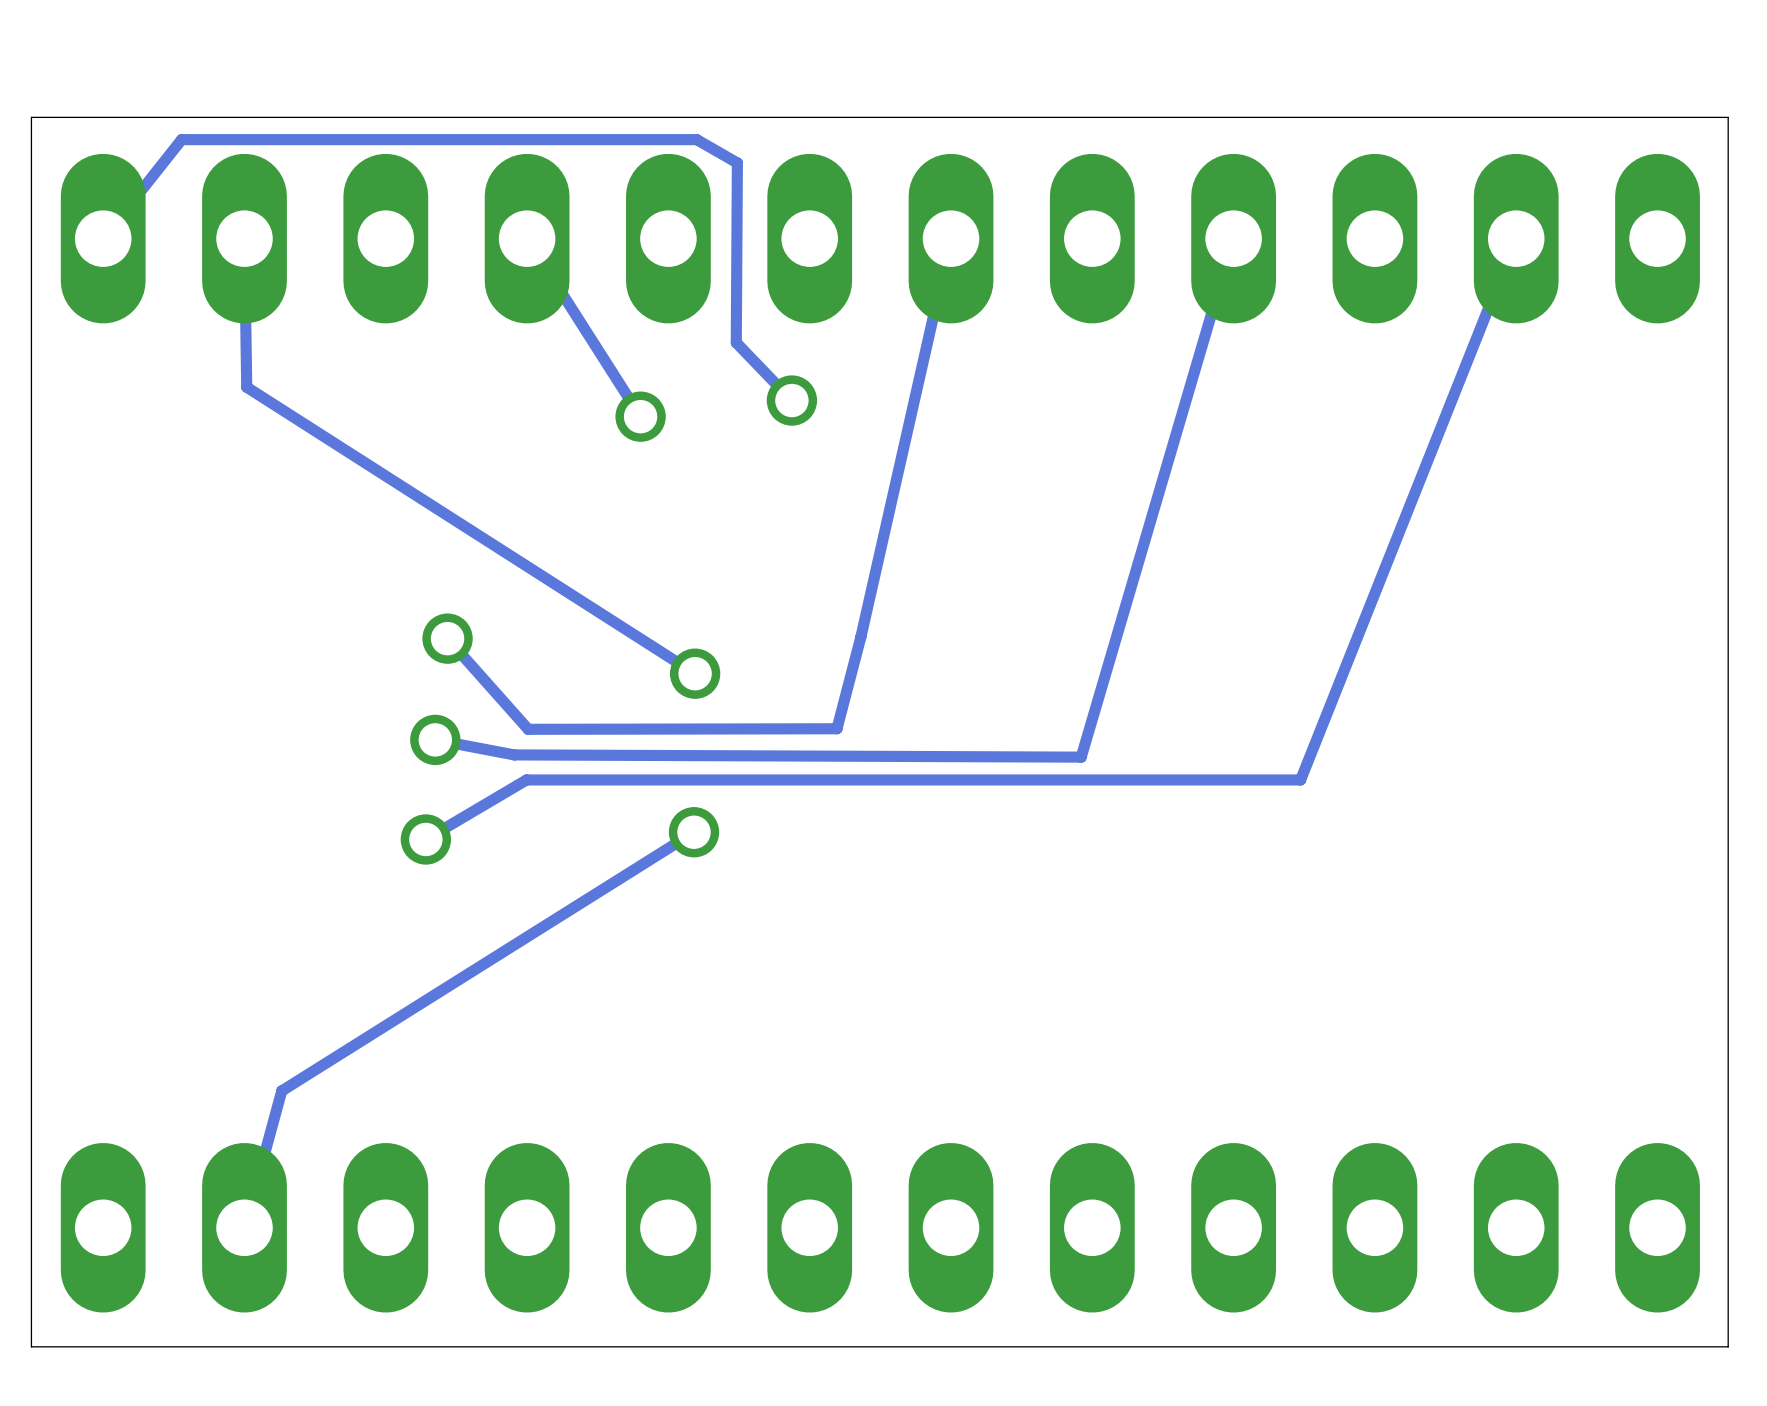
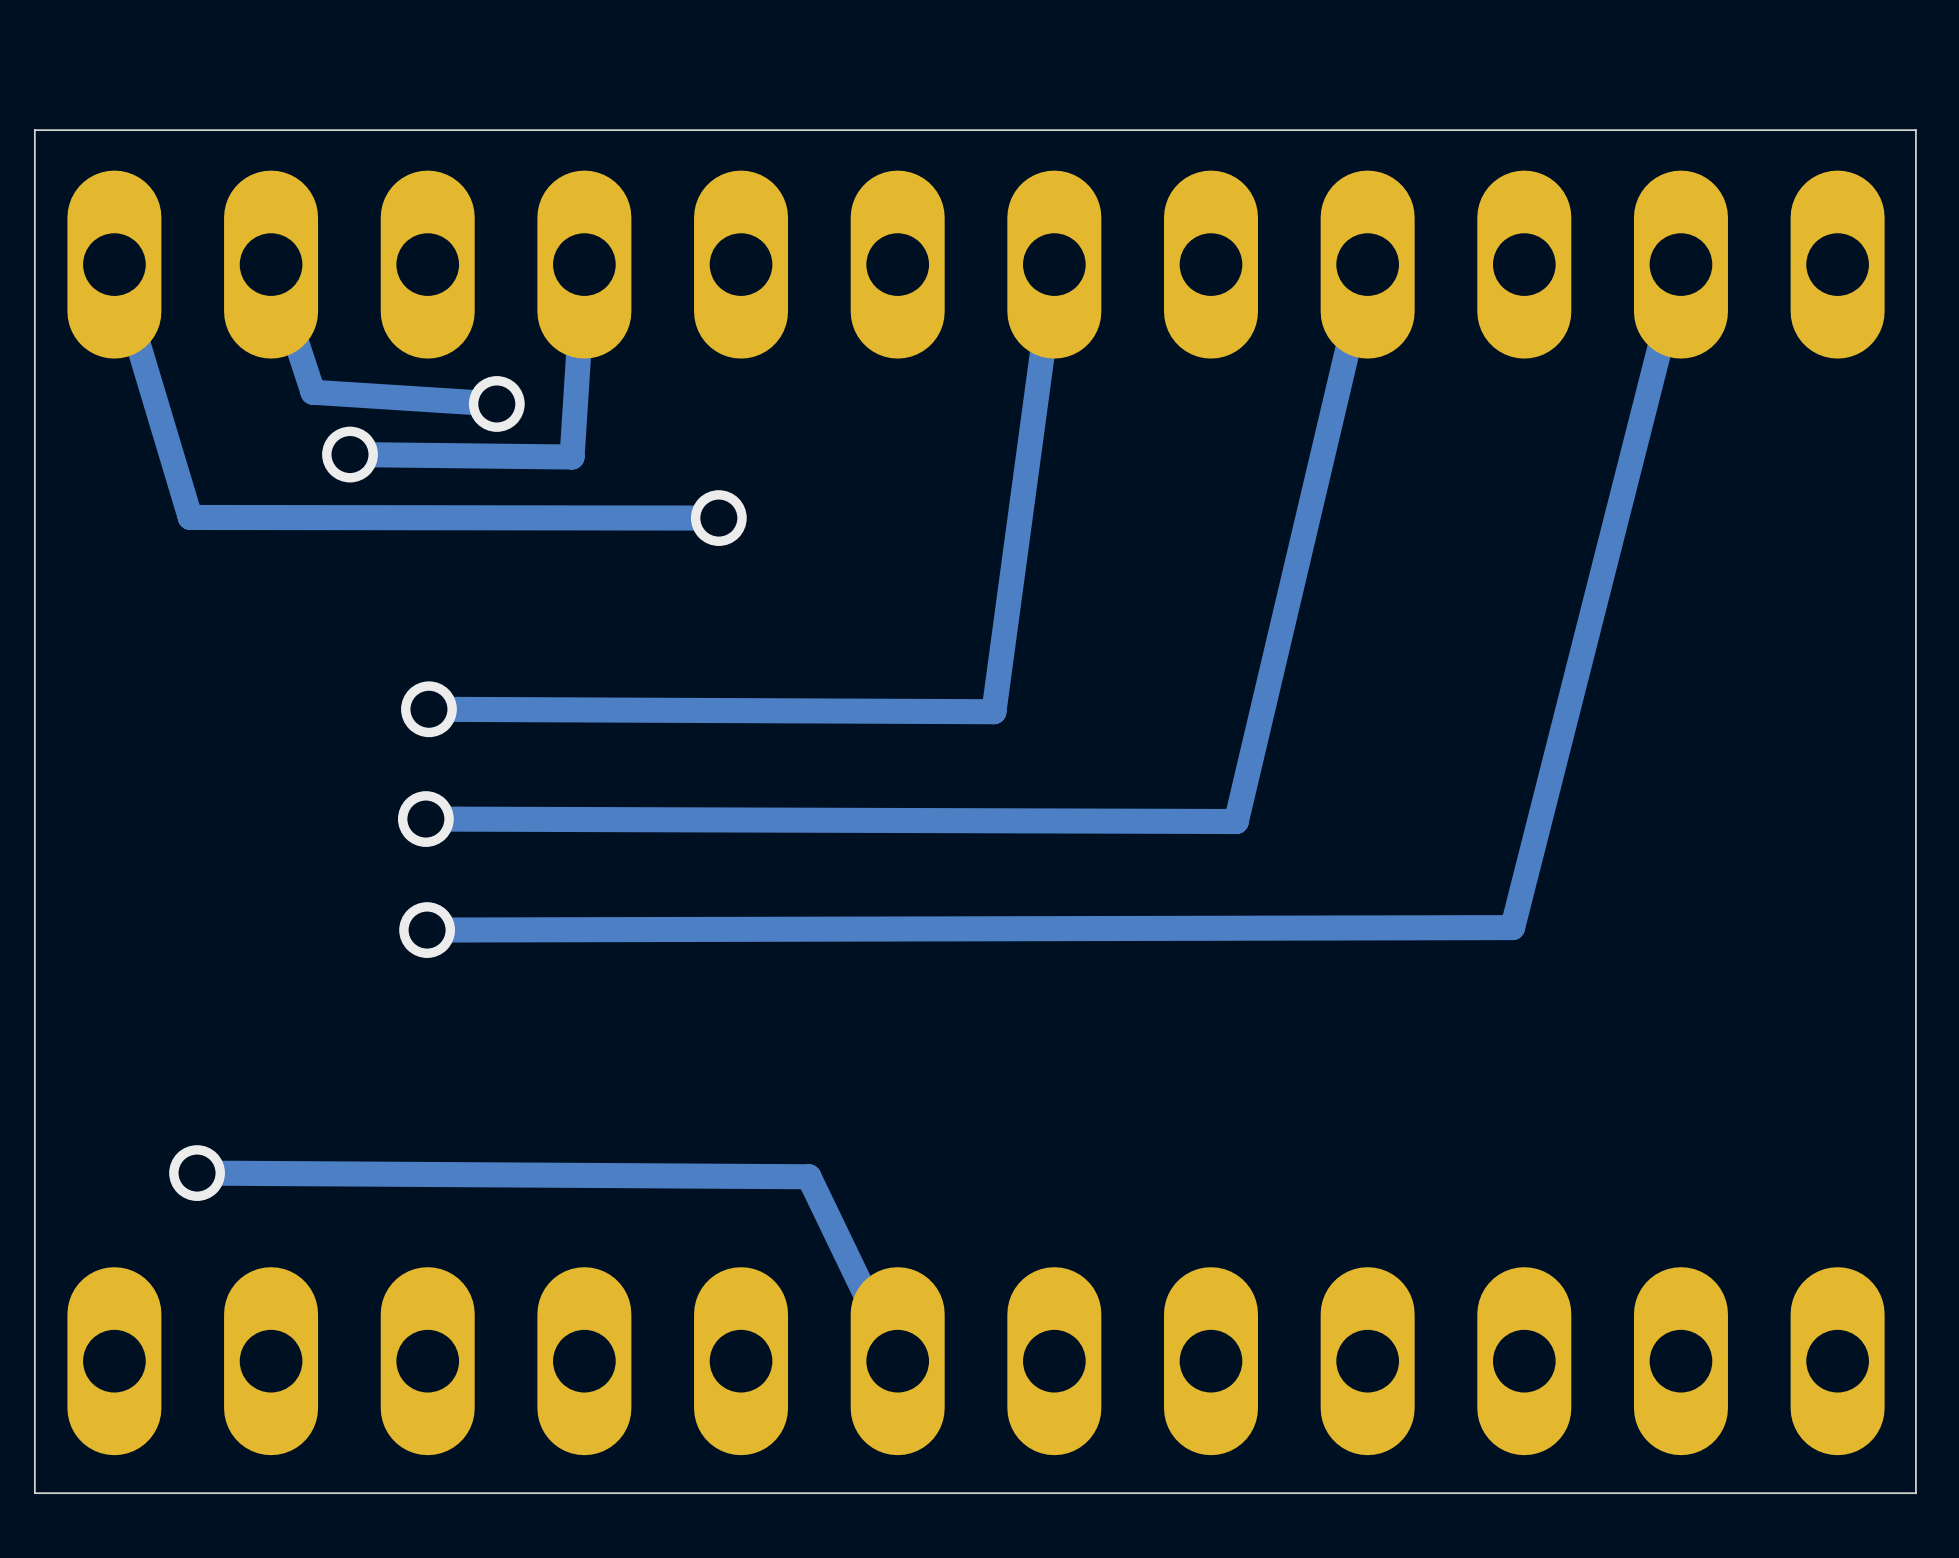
track: (103, 238) (181, 139) (696, 139) (737, 163) (736, 342) (791, 400) -> (114, 264) (190, 517) (718, 518)
track: (244, 238) (246, 387) (695, 673) -> (271, 264) (313, 392) (496, 403)
track: (527, 238) (640, 416) -> (584, 264) (572, 457) (350, 454)
track: (951, 238) (860, 636) (836, 728) (528, 729) (447, 638) -> (1054, 264) (993, 711) (428, 709)
track: (1233, 238) (1081, 757) (514, 754) (435, 739) -> (1367, 264) (1236, 821) (425, 819)
track: (1516, 238) (1300, 779) (526, 779) (425, 839) -> (1680, 264) (1512, 927) (427, 930)
via: none -> (496, 403)
via: (791, 400) -> none
via: none -> (350, 454)
via position: (640, 416) -> (718, 518)
via: (447, 638) -> none
via: none -> (428, 709)
via: (695, 673) -> none
via position: (435, 739) -> (425, 819)
track: (694, 832) (281, 1090) (244, 1227) -> none
via: (694, 832) -> none
via position: (425, 839) -> (427, 930)
track: none -> (197, 1173) (808, 1176) (897, 1361)
via: none -> (197, 1173)

